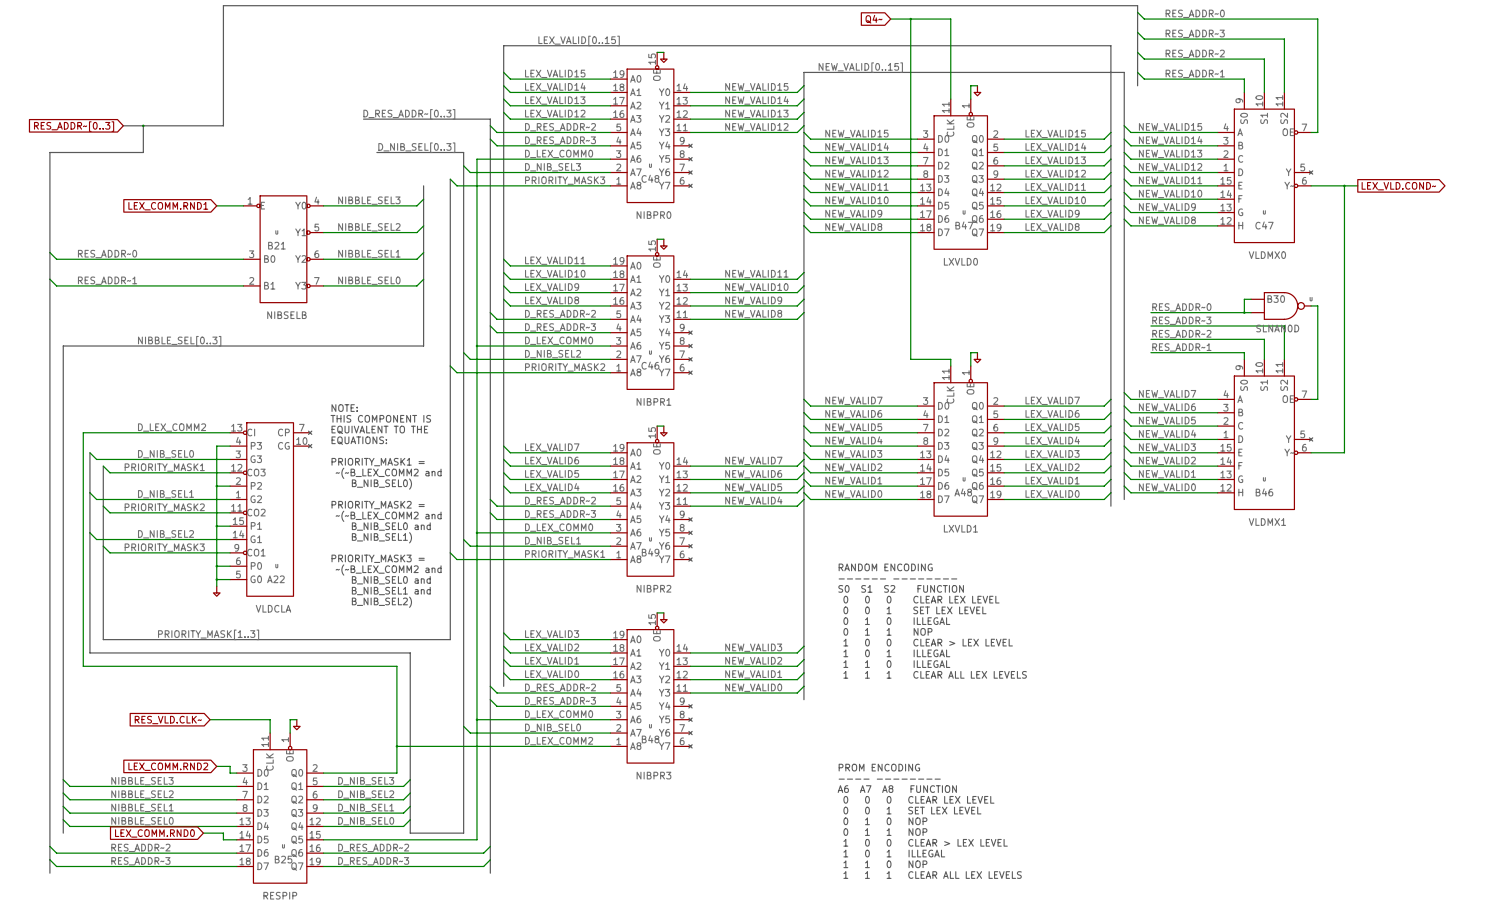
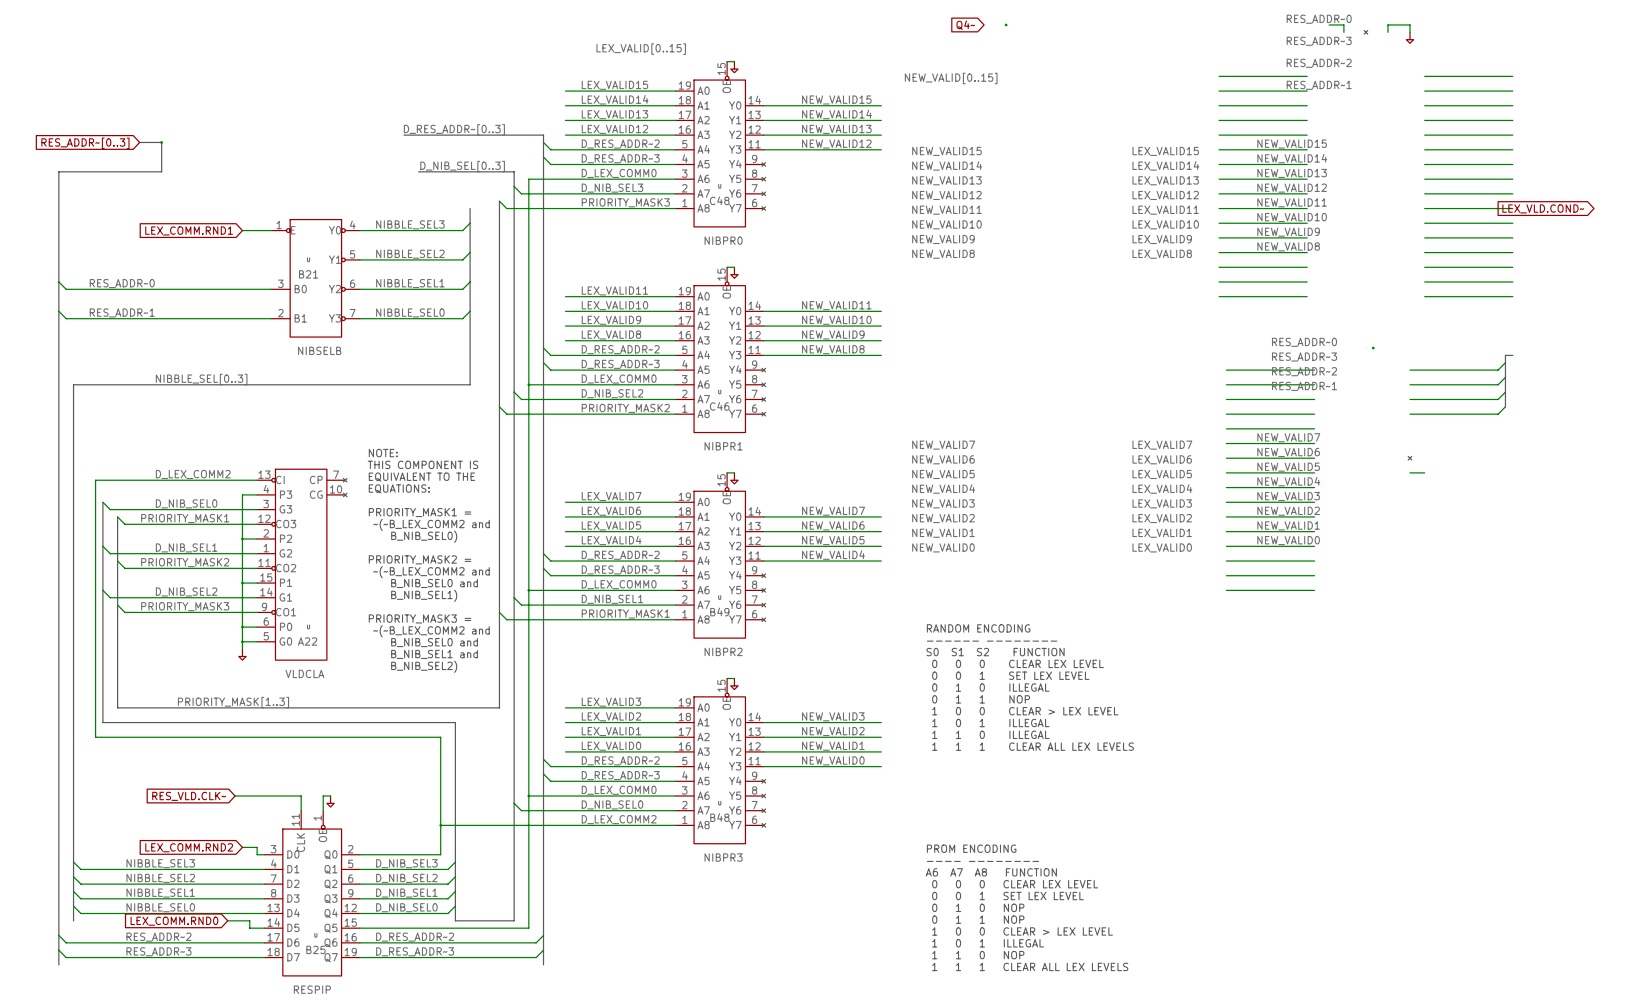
wire: (1137, 12) (1144, 19) (1204, 19) -> none
wire: (890, 19) (950, 19) (950, 99) -> none
wire: (910, 19) (910, 359) (950, 359) (950, 366) -> none
wire: (1217, 19) (1257, 19) -> (1343, 24) (1343, 32)
wire: none -> (1387, 24) (1387, 32)
wire: (1277, 19) (1317, 19) (1317, 132) -> (1409, 24) (1409, 32)
no-connect mark: none -> (1365, 32)
power symbol: none -> (1409, 37)
wire: (1137, 32) (1144, 39) (1284, 39) (1284, 92) -> none
wire: (1137, 52) (1144, 59) (1264, 59) (1264, 92) -> none
wire: none -> (1219, 76) (1307, 76)
wire: none -> (1424, 76) (1512, 76)
wire: (503, 72) (510, 79) -> none
wire: (1137, 72) (1144, 79) -> (1219, 91) (1263, 91)
wire: (1184, 79) (1244, 79) (1244, 92) -> none
wire: none -> (1424, 91) (1512, 91)
wire: (503, 85) (510, 92) -> none
wire: (803, 85) (797, 92) -> none
wire: (977, 85) (970, 85) (970, 99) -> none
bus: (1137, 85) (1137, 5) (223, 5) (223, 125) (143, 125) -> none
power symbol: (977, 90) -> none
wire: none -> (1219, 105) (1307, 105)
wire: none -> (1424, 105) (1512, 105)
wire: (503, 99) (510, 105) -> none
wire: (803, 99) (797, 105) -> none
wire: none -> (1219, 120) (1307, 120)
wire: none -> (1424, 120) (1512, 120)
wire: (503, 112) (510, 119) -> none
wire: (803, 112) (797, 119) -> none
wire: none -> (1219, 135) (1307, 135)
wire: none -> (1424, 135) (1512, 135)
wire: (803, 125) (797, 132) -> none
wire: (1124, 125) (1130, 132) -> (1219, 149) (1248, 149)
wire: (803, 132) (810, 139) (917, 139) -> none
wire: (1110, 132) (1104, 139) (1004, 139) -> none
wire: (1184, 132) (1217, 132) -> none
wire: none -> (1454, 149) (1512, 149)
wire: (1124, 139) (1130, 145) -> (1219, 164) (1248, 164)
wire: (803, 145) (810, 152) (917, 152) -> none
wire: (1110, 145) (1104, 152) (1004, 152) -> none
wire: (1184, 145) (1217, 145) -> none
wire: none -> (1424, 164) (1512, 164)
wire: (1124, 152) (1130, 159) -> (1219, 179) (1248, 179)
wire: (803, 159) (810, 165) (917, 165) -> none
wire: (1110, 159) (1104, 165) (1004, 165) -> none
wire: (1184, 159) (1217, 159) -> none
wire: none -> (1424, 179) (1512, 179)
wire: (1124, 165) (1130, 172) -> (1219, 193) (1248, 193)
part: (1264, 167) -> none
wire: (803, 172) (810, 179) (917, 179) -> none
wire: (1110, 172) (1104, 179) (1004, 179) -> none
wire: (1184, 172) (1217, 172) -> none
wire: none -> (1424, 193) (1512, 193)
no-connect mark: (1311, 172) -> none
part: (960, 174) -> none
wire: (1124, 179) (1130, 185) -> (1219, 208) (1248, 208)
wire: (803, 185) (810, 192) (917, 192) -> none
wire: (1110, 185) (1104, 192) (1004, 192) -> none
wire: (1184, 185) (1217, 185) -> none
wire: (1344, 185) (1344, 452) (1311, 452) -> none
wire: none -> (1498, 208) (1512, 208)
wire: (1124, 192) (1130, 199) -> (1219, 223) (1248, 223)
wire: (803, 199) (810, 205) (917, 205) -> none
wire: (1110, 199) (1104, 205) (1004, 205) -> none
wire: (1184, 199) (1217, 199) -> none
wire: none -> (1424, 223) (1512, 223)
wire: (1124, 205) (1130, 212) -> (1219, 237) (1248, 237)
wire: (803, 212) (810, 219) (917, 219) -> none
wire: (1110, 212) (1104, 219) (1004, 219) -> none
wire: (1184, 212) (1217, 212) -> none
wire: none -> (1424, 237) (1512, 237)
wire: (1124, 219) (1130, 225) -> (1219, 252) (1248, 252)
wire: (803, 225) (810, 232) (917, 232) -> none
wire: (1110, 225) (1104, 232) (1004, 232) -> none
wire: (1184, 225) (1217, 225) -> none
wire: none -> (1424, 252) (1512, 252)
wire: none -> (1219, 267) (1307, 267)
wire: none -> (1424, 267) (1512, 267)
wire: none -> (1219, 281) (1307, 281)
wire: none -> (1424, 281) (1512, 281)
wire: (503, 259) (510, 265) -> none
wire: none -> (1219, 296) (1307, 296)
wire: none -> (1424, 296) (1512, 296)
wire: (503, 272) (510, 279) -> none
wire: (803, 272) (797, 279) -> none
wire: (503, 285) (510, 292) -> none
wire: (803, 285) (797, 292) -> none
wire: (503, 299) (510, 305) -> none
wire: (803, 299) (797, 305) -> none
wire: (1251, 299) (1244, 299) (1244, 312) -> none
part: (1281, 305) -> none
wire: (1311, 305) (1317, 305) (1317, 399) (1311, 399) -> none
wire: (803, 312) (797, 319) -> none
wire: (1150, 312) (1251, 312) -> none
bus: none -> (1512, 355) (1505, 355) (1505, 406)
wire: (1150, 325) (1284, 325) (1284, 359) -> none
wire: none -> (1505, 362) (1498, 370) (1409, 370)
wire: none -> (1226, 370) (1314, 370)
wire: (1150, 339) (1264, 339) (1264, 359) -> none
wire: none -> (1505, 377) (1498, 384) (1409, 384)
wire: none -> (1226, 384) (1314, 384)
wire: (977, 352) (970, 352) (970, 366) -> none
wire: (1150, 352) (1244, 352) (1244, 359) -> none
wire: none -> (1505, 392) (1498, 399) (1409, 399)
power symbol: (977, 357) -> none
wire: none -> (1226, 399) (1314, 399)
wire: none -> (1505, 406) (1498, 414) (1409, 414)
wire: none -> (1226, 414) (1314, 414)
wire: none -> (1226, 428) (1314, 428)
wire: (1124, 392) (1130, 399) -> (1226, 443) (1248, 443)
wire: (803, 399) (810, 406) (917, 406) -> none
wire: (1110, 399) (1104, 406) (1004, 406) -> none
wire: (1190, 399) (1217, 399) -> none
wire: (1124, 406) (1130, 412) -> (1226, 458) (1248, 458)
wire: (803, 412) (810, 419) (917, 419) -> none
wire: (1110, 412) (1104, 419) (1004, 419) -> none
wire: (1190, 412) (1217, 412) -> none
no-connect mark: none -> (1409, 458)
wire: (1124, 419) (1130, 426) -> (1226, 472) (1248, 472)
wire: (803, 426) (810, 432) (917, 432) -> none
wire: (1110, 426) (1104, 432) (1004, 432) -> none
wire: (1190, 426) (1217, 426) -> none
wire: none -> (1409, 472) (1424, 472)
wire: (1124, 432) (1130, 439) -> (1226, 487) (1248, 487)
part: (1264, 434) -> none
wire: (803, 439) (810, 446) (917, 446) -> none
wire: (1110, 439) (1104, 446) (1004, 446) -> none
wire: (1190, 439) (1217, 439) -> none
no-connect mark: (1311, 439) -> none
part: (960, 441) -> none
wire: (503, 446) (510, 452) -> none
wire: (1124, 446) (1130, 452) -> (1226, 502) (1248, 502)
wire: (803, 452) (810, 459) (917, 459) -> none
wire: (1110, 452) (1104, 459) (1004, 459) -> none
wire: (1190, 452) (1217, 452) -> none
wire: (503, 459) (510, 466) -> none
wire: (803, 459) (797, 466) -> none
wire: (1124, 459) (1130, 466) -> (1226, 516) (1248, 516)
wire: (803, 466) (810, 472) (917, 472) -> none
wire: (1110, 466) (1104, 472) (1004, 472) -> none
wire: (1190, 466) (1217, 466) -> none
wire: (503, 472) (510, 479) -> none
wire: (803, 472) (797, 479) -> none
wire: (1124, 472) (1130, 479) -> (1226, 531) (1248, 531)
wire: (803, 479) (810, 486) (917, 486) -> none
wire: (1110, 479) (1104, 486) (1004, 486) -> none
wire: (1190, 479) (1217, 479) -> none
wire: (503, 486) (510, 492) -> none
wire: (803, 486) (797, 492) -> none
wire: (1124, 486) (1130, 492) -> (1226, 546) (1248, 546)
wire: (803, 492) (810, 499) (917, 499) -> none
wire: (1110, 492) (1104, 499) (1004, 499) -> none
wire: (1190, 492) (1217, 492) -> none
wire: (803, 499) (797, 506) -> none
bus: (1124, 499) (1124, 72) (803, 72) (803, 699) -> none
wire: none -> (1226, 561) (1314, 561)
bus: (1110, 506) (1110, 45) (503, 45) (503, 686) -> none
wire: none -> (1226, 575) (1314, 575)
wire: none -> (1226, 590) (1314, 590)
wire: (503, 632) (510, 639) -> none
wire: (503, 646) (510, 652) -> none
wire: (803, 646) (797, 652) -> none
wire: (503, 659) (510, 666) -> none
wire: (803, 659) (797, 666) -> none
wire: (503, 672) (510, 679) -> none
wire: (803, 672) (797, 679) -> none
wire: (803, 686) (797, 693) -> none

